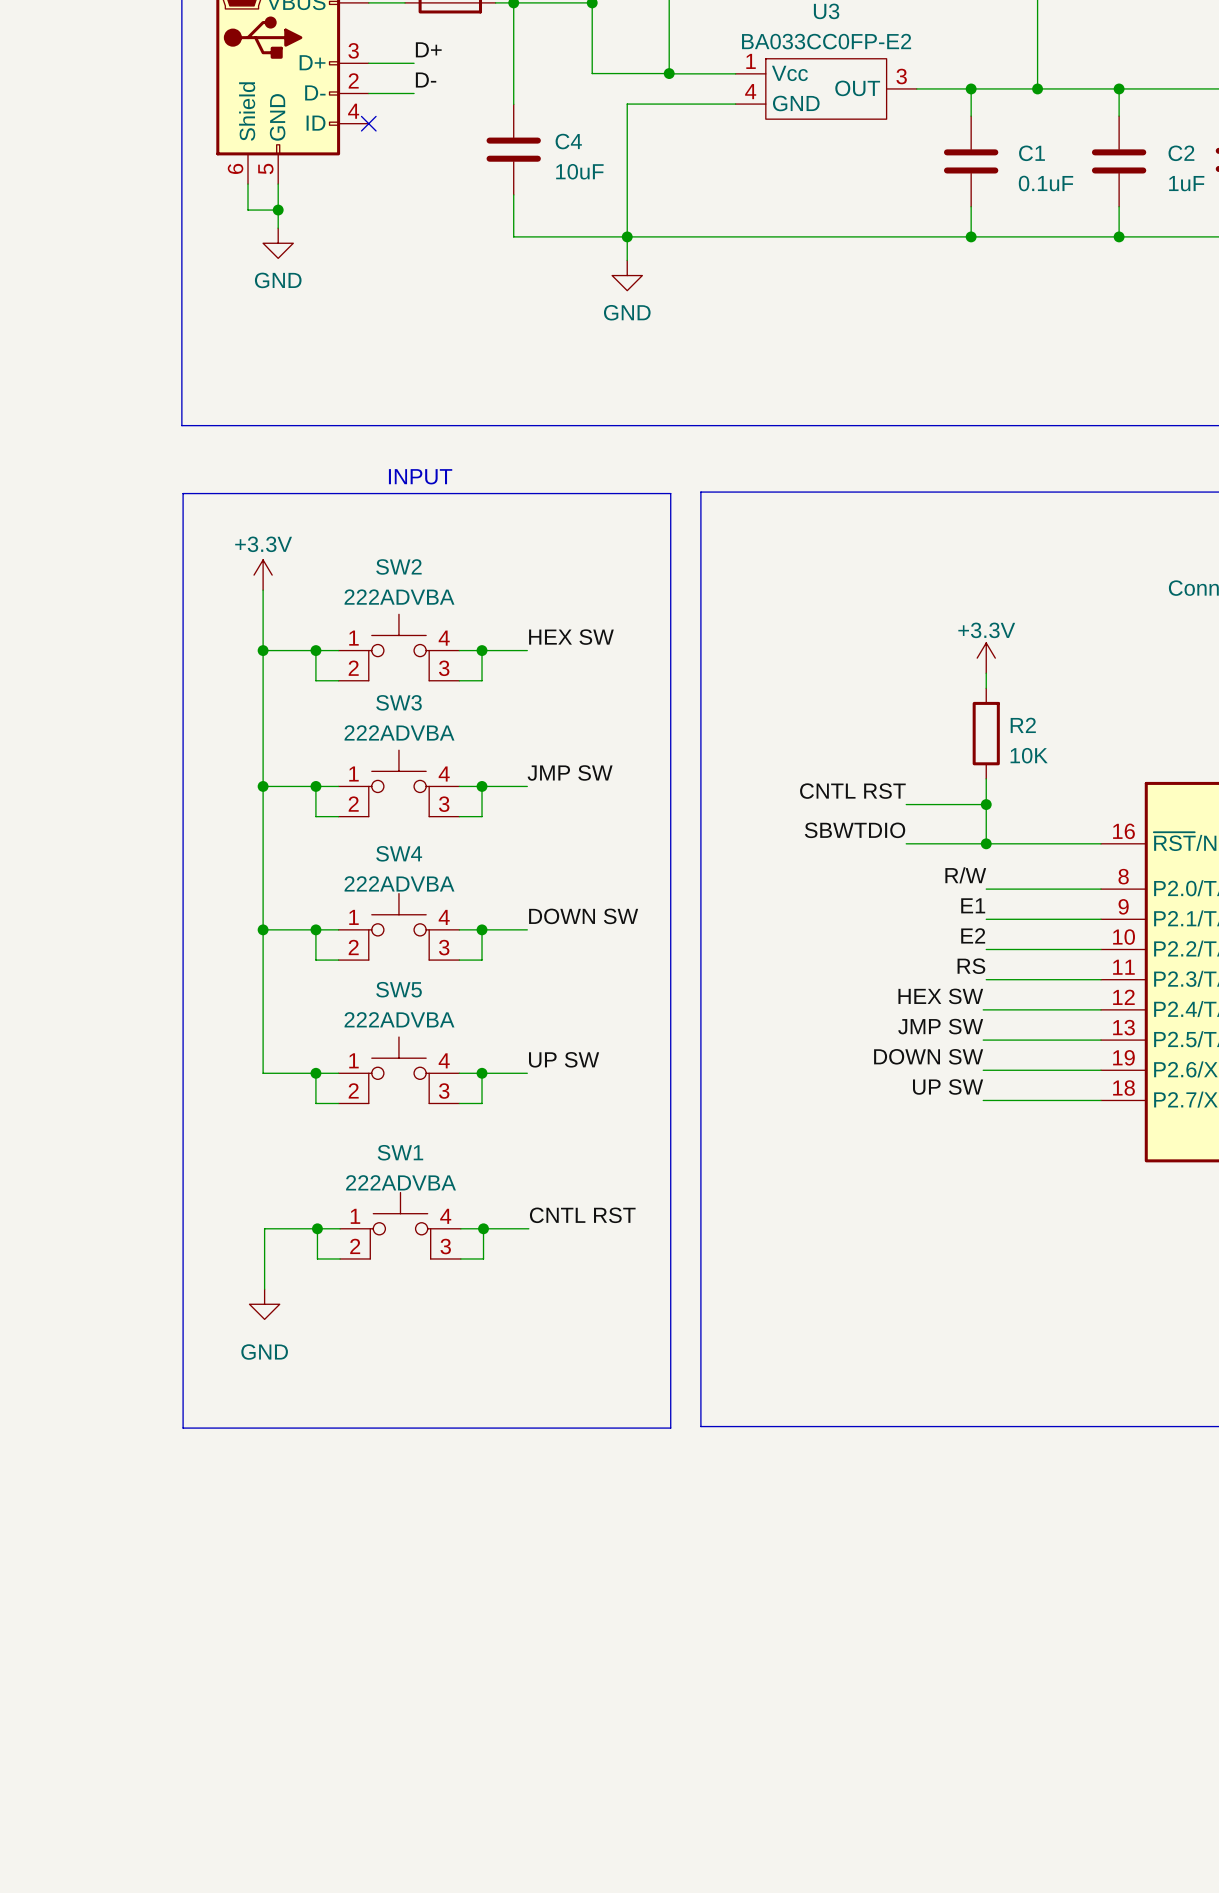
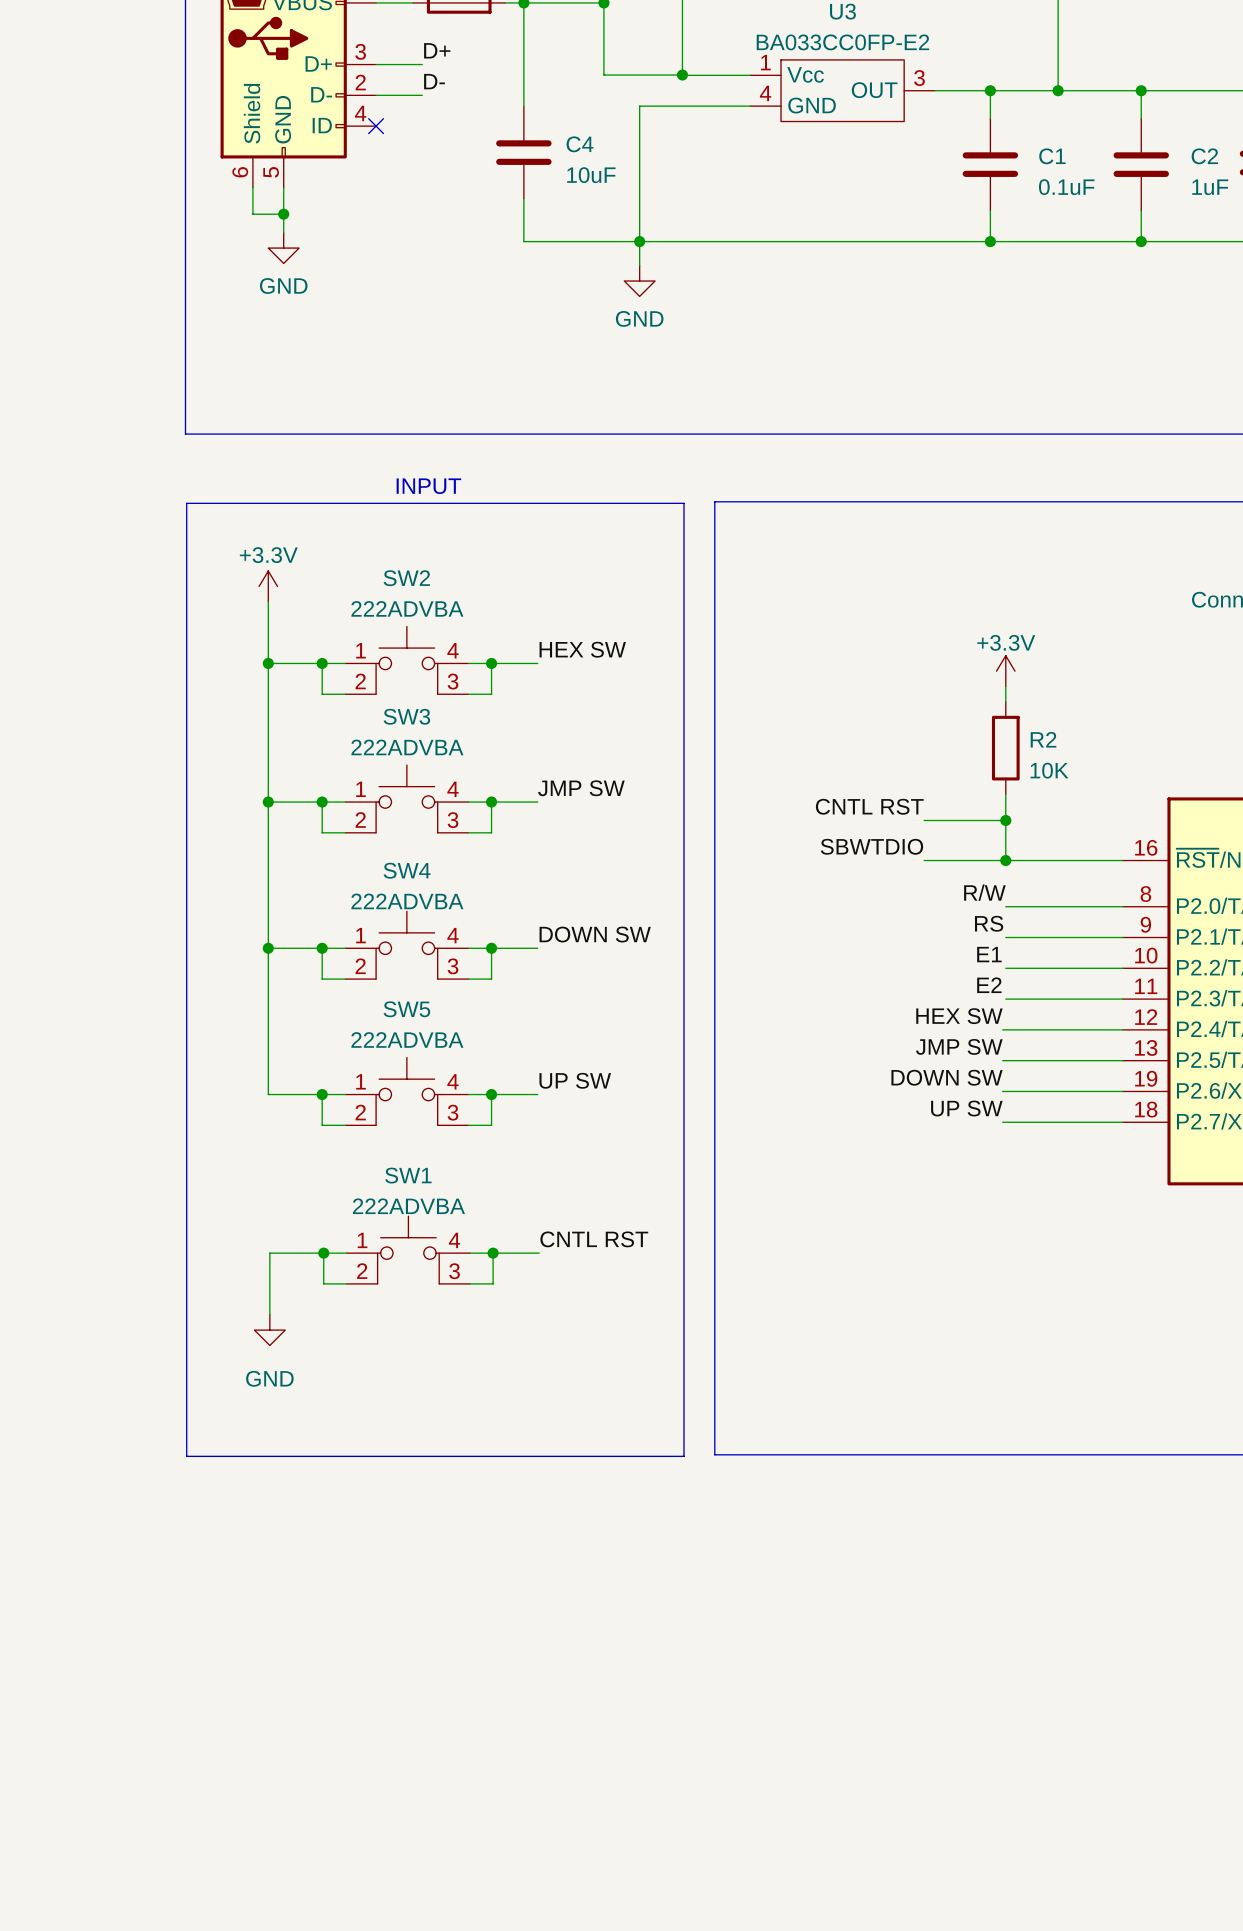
label: E1 (973, 905) -> RS (989, 923)
label: E2 (973, 935) -> E1 (989, 954)
label: RS (971, 966) -> E2 (989, 985)

